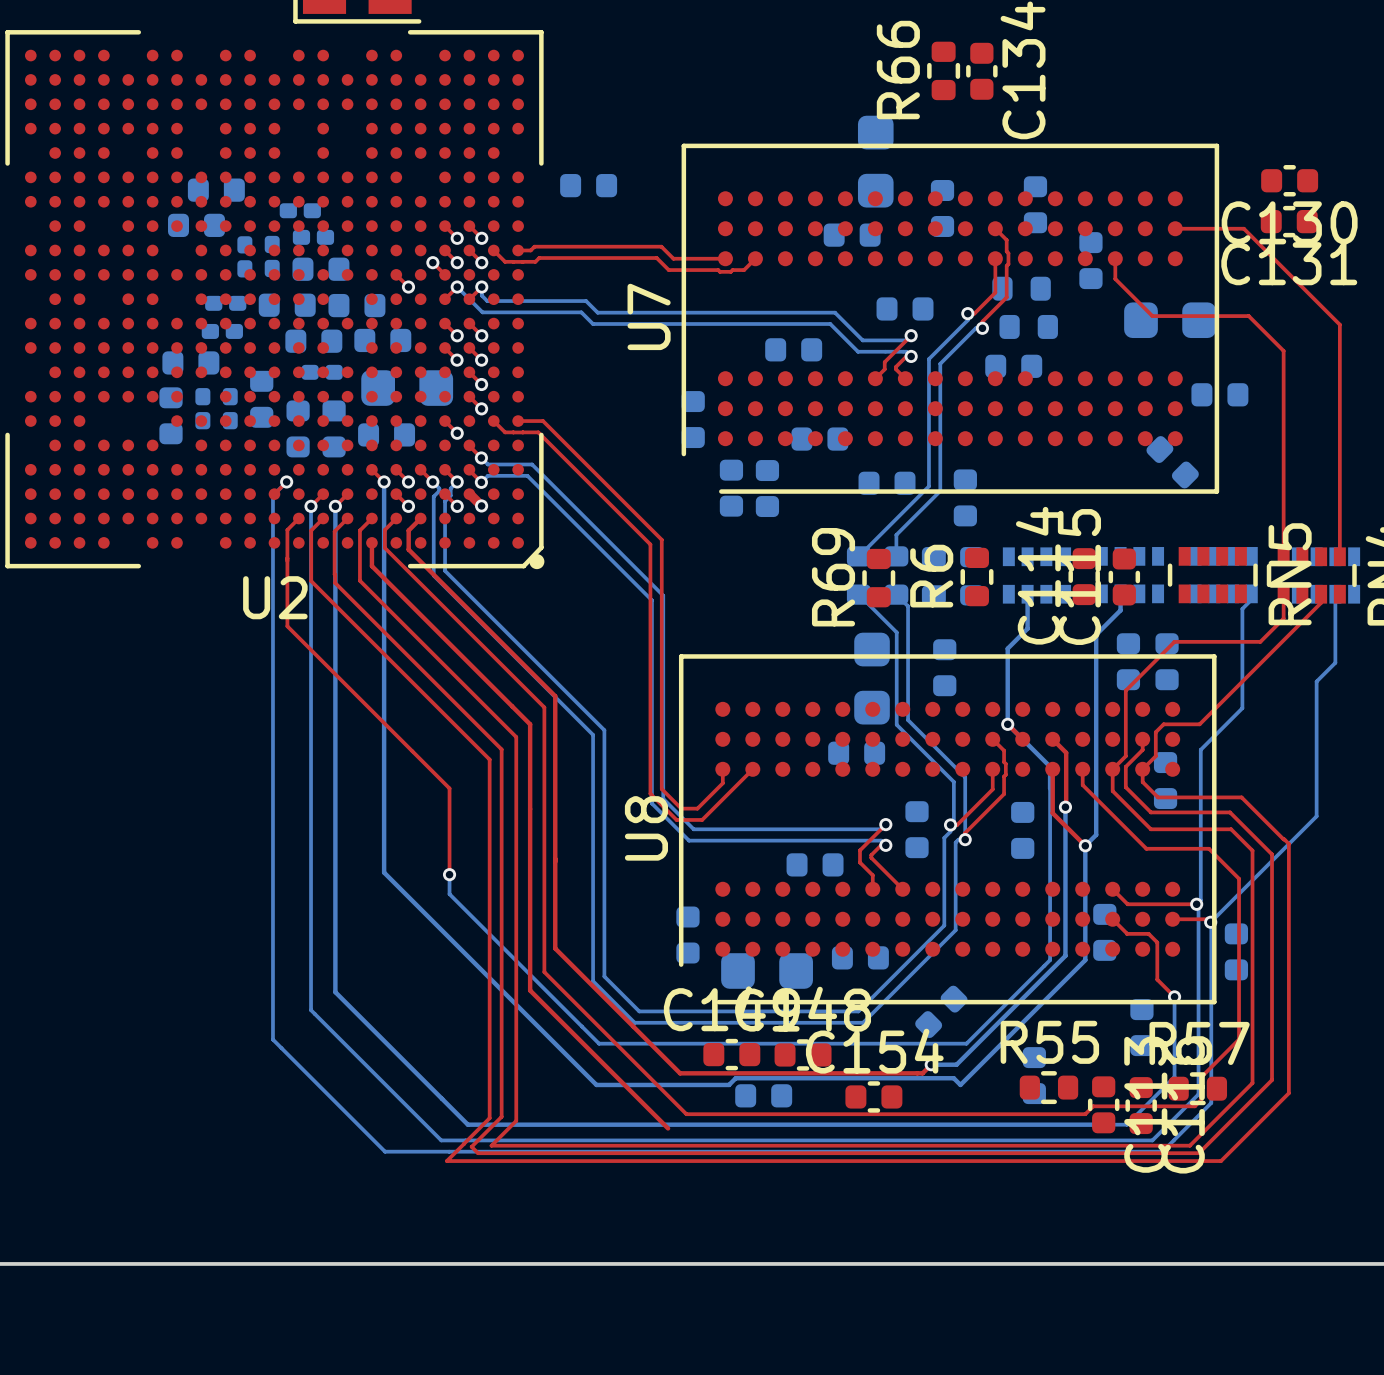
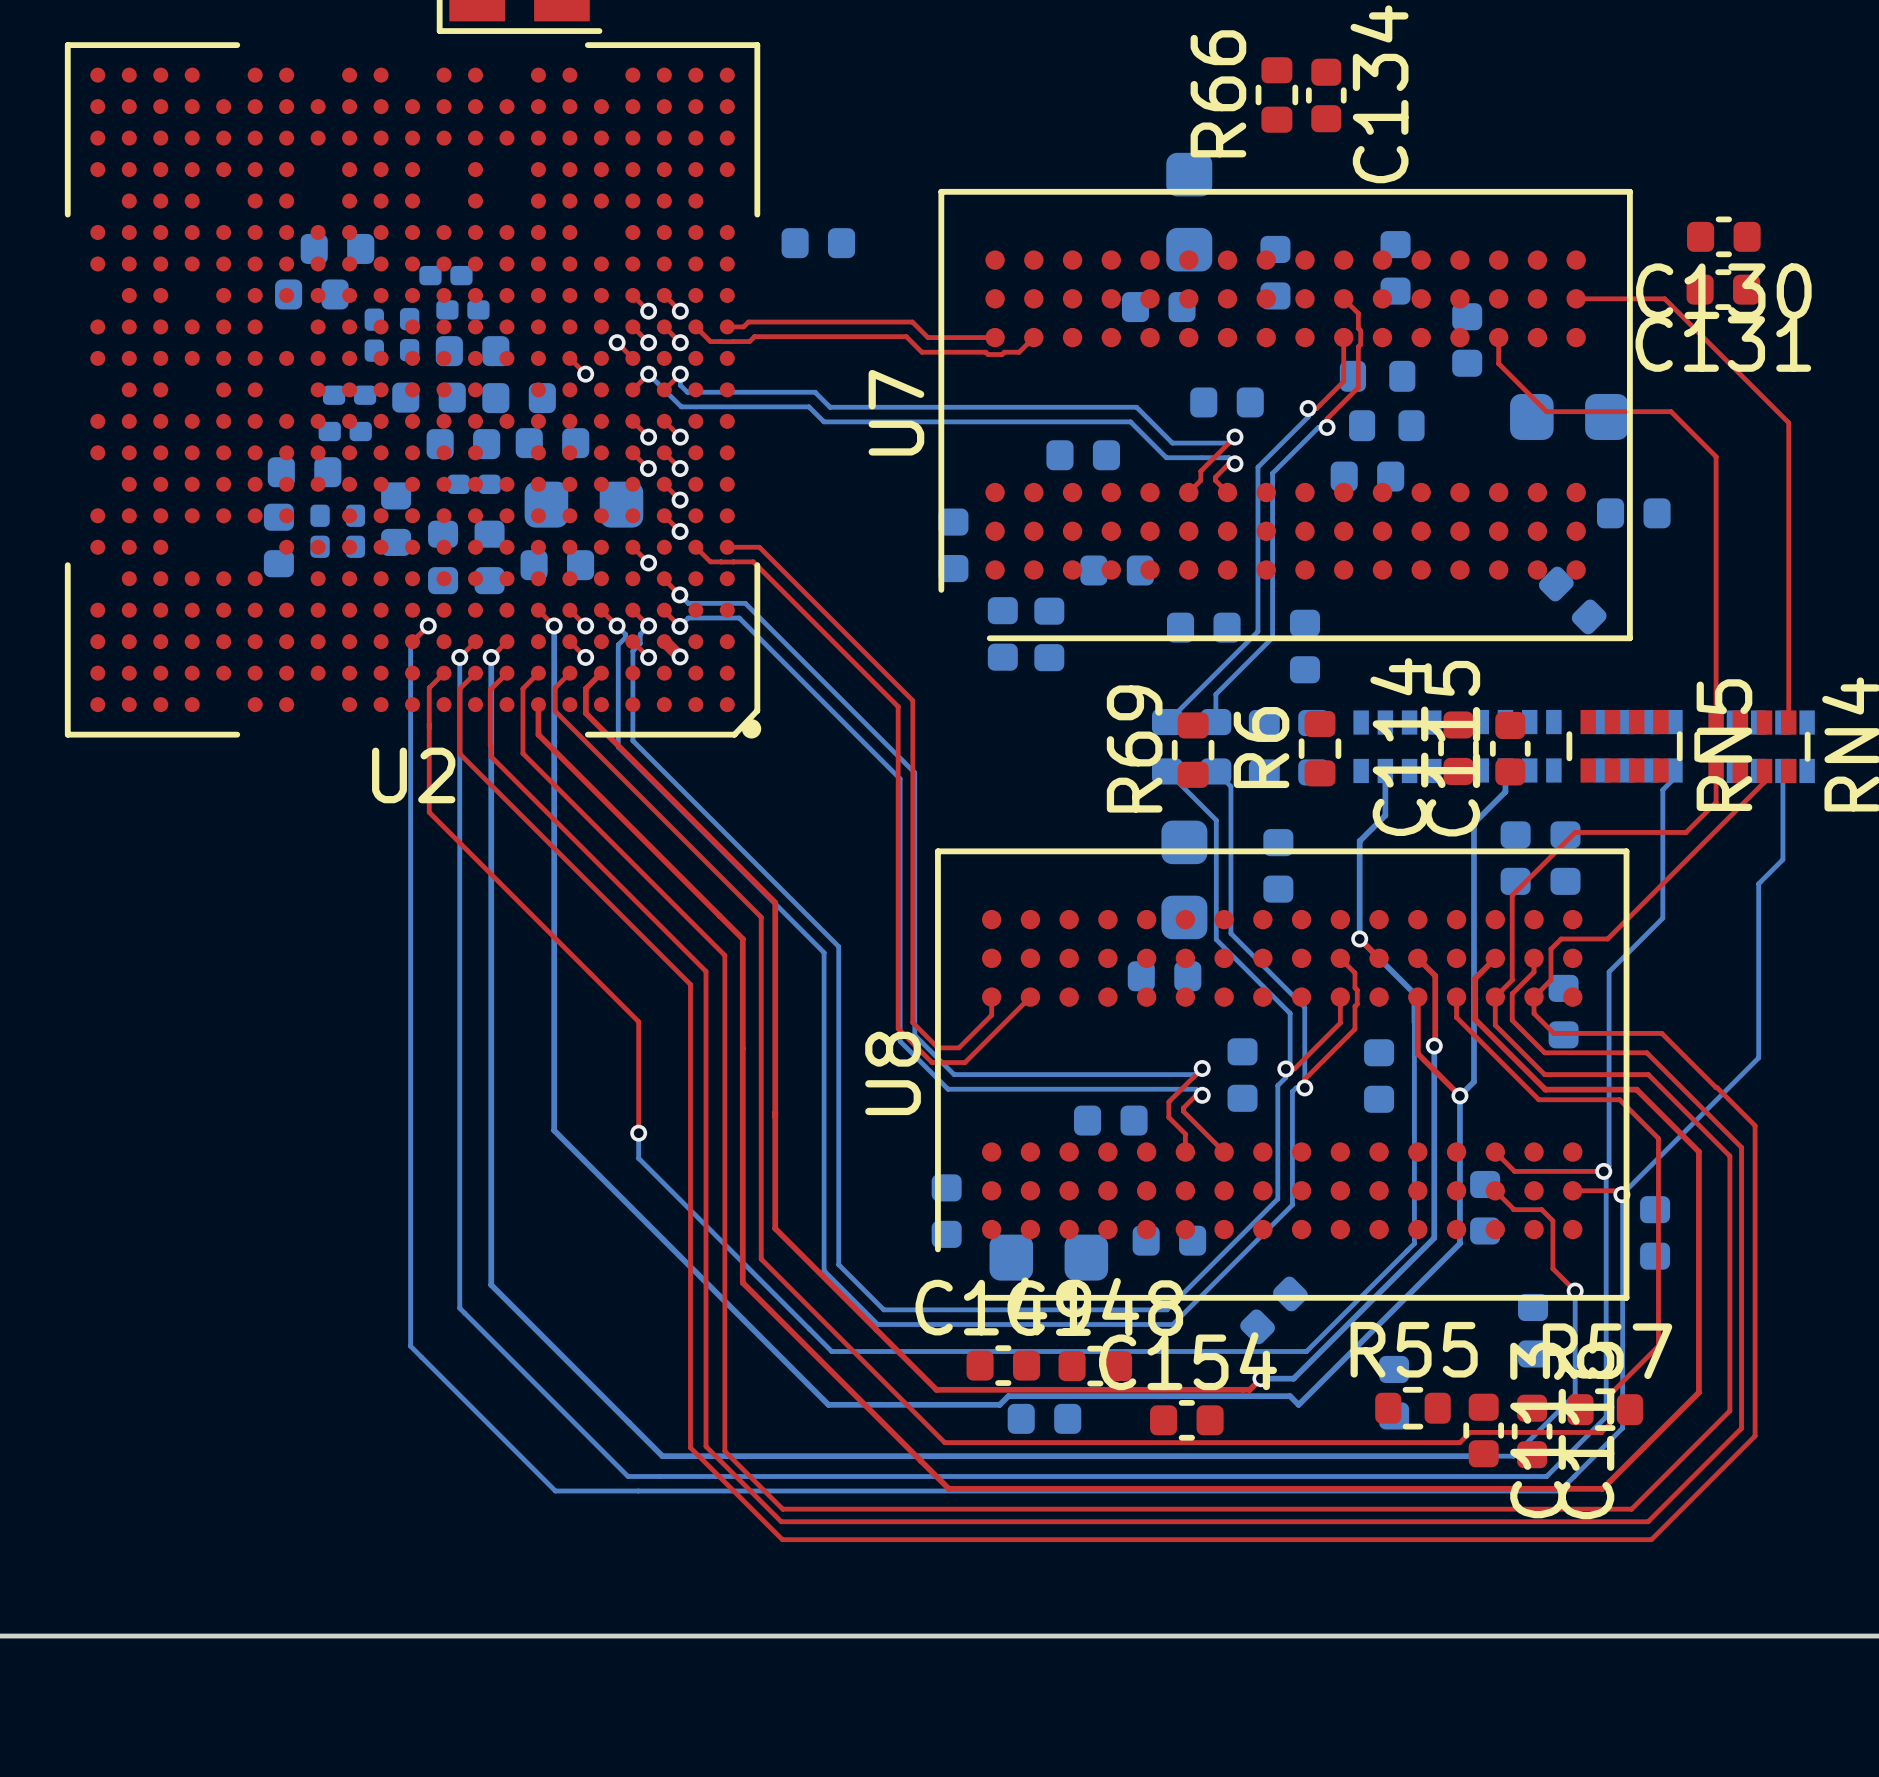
top track: none -> (1495, 958) (1475, 978) (1475, 1019) (1545, 1089) (1636, 1089) (1698, 1151) (1698, 1392) (1602, 1488) (948, 1488) (920, 1460)
top track: (1288, 843) (1288, 1093) (1221, 1161) (446, 1161) (489, 1118) -> (1722, 1093) (1755, 1125) (1755, 1436) (1651, 1539) (782, 1539) (690, 1447)
top track: (1252, 850) (1252, 1083) (1189, 1145) (491, 1145) (516, 1120) -> (1675, 1102) (1729, 1156) (1729, 1410) (1631, 1509) (782, 1509) (724, 1451)
top track: (1272, 854) (1272, 1080) (1198, 1153) (478, 1153) (471, 1146) (501, 1116) -> (1701, 1107) (1741, 1147) (1741, 1428) (1648, 1521) (781, 1521) (705, 1446)

